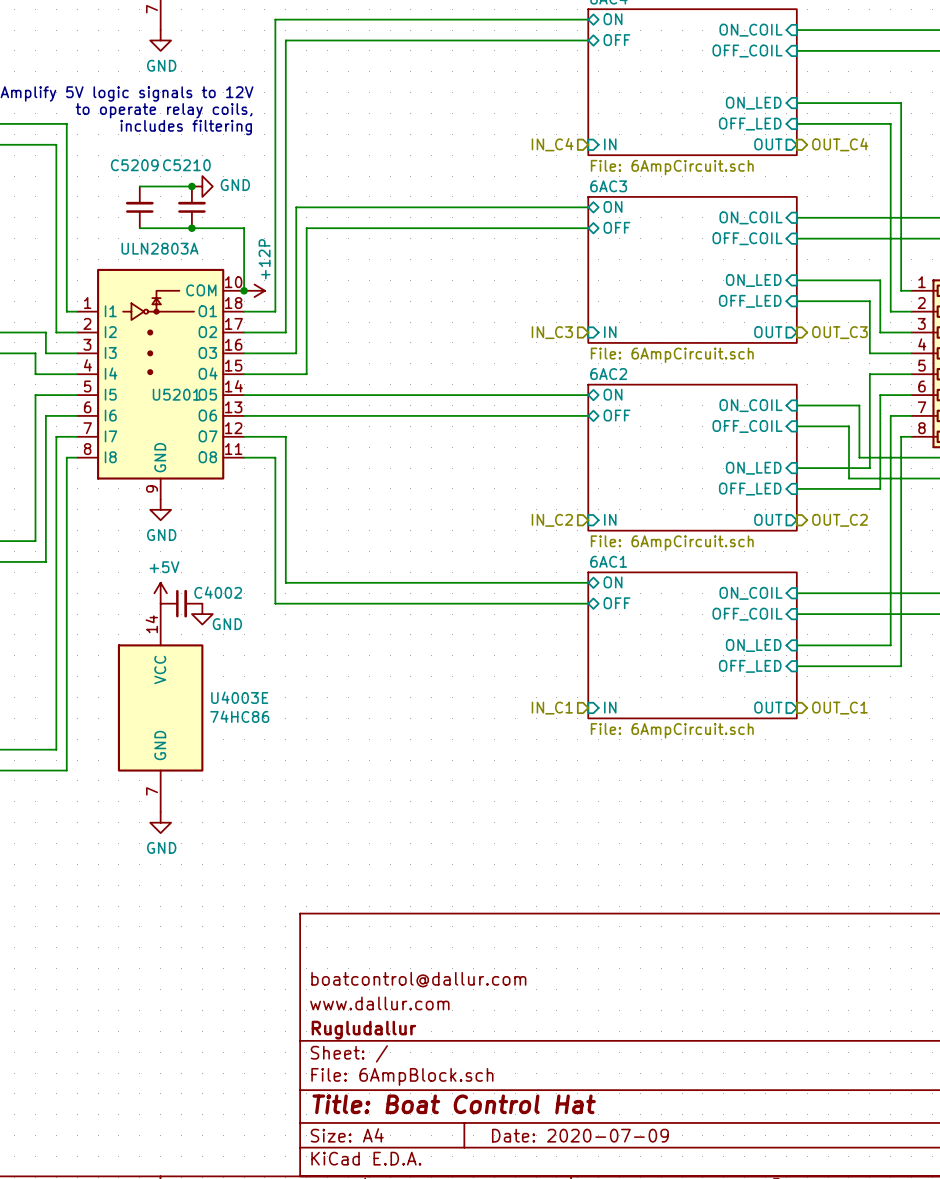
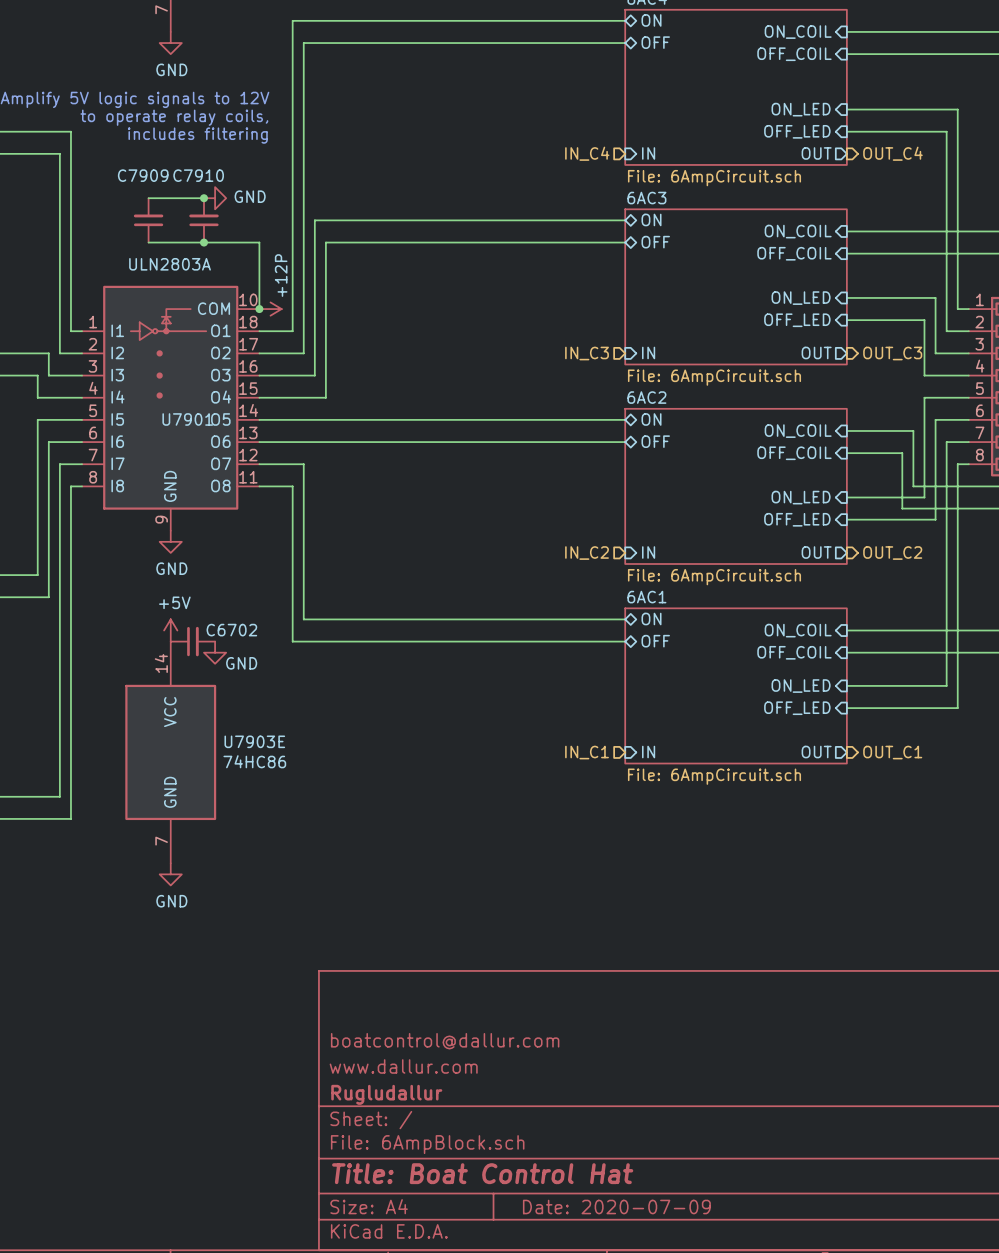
C5209 name: C5209 (134, 165) -> C7909 (143, 175)
C5210 name: C5210 (186, 165) -> C7910 (198, 175)
U5201 name: U5201 (176, 394) -> U7901 (187, 419)
C4002 name: C4002 (218, 592) -> C6702 (231, 630)
U4003E name: U4003E (239, 697) -> U7903E (254, 741)

